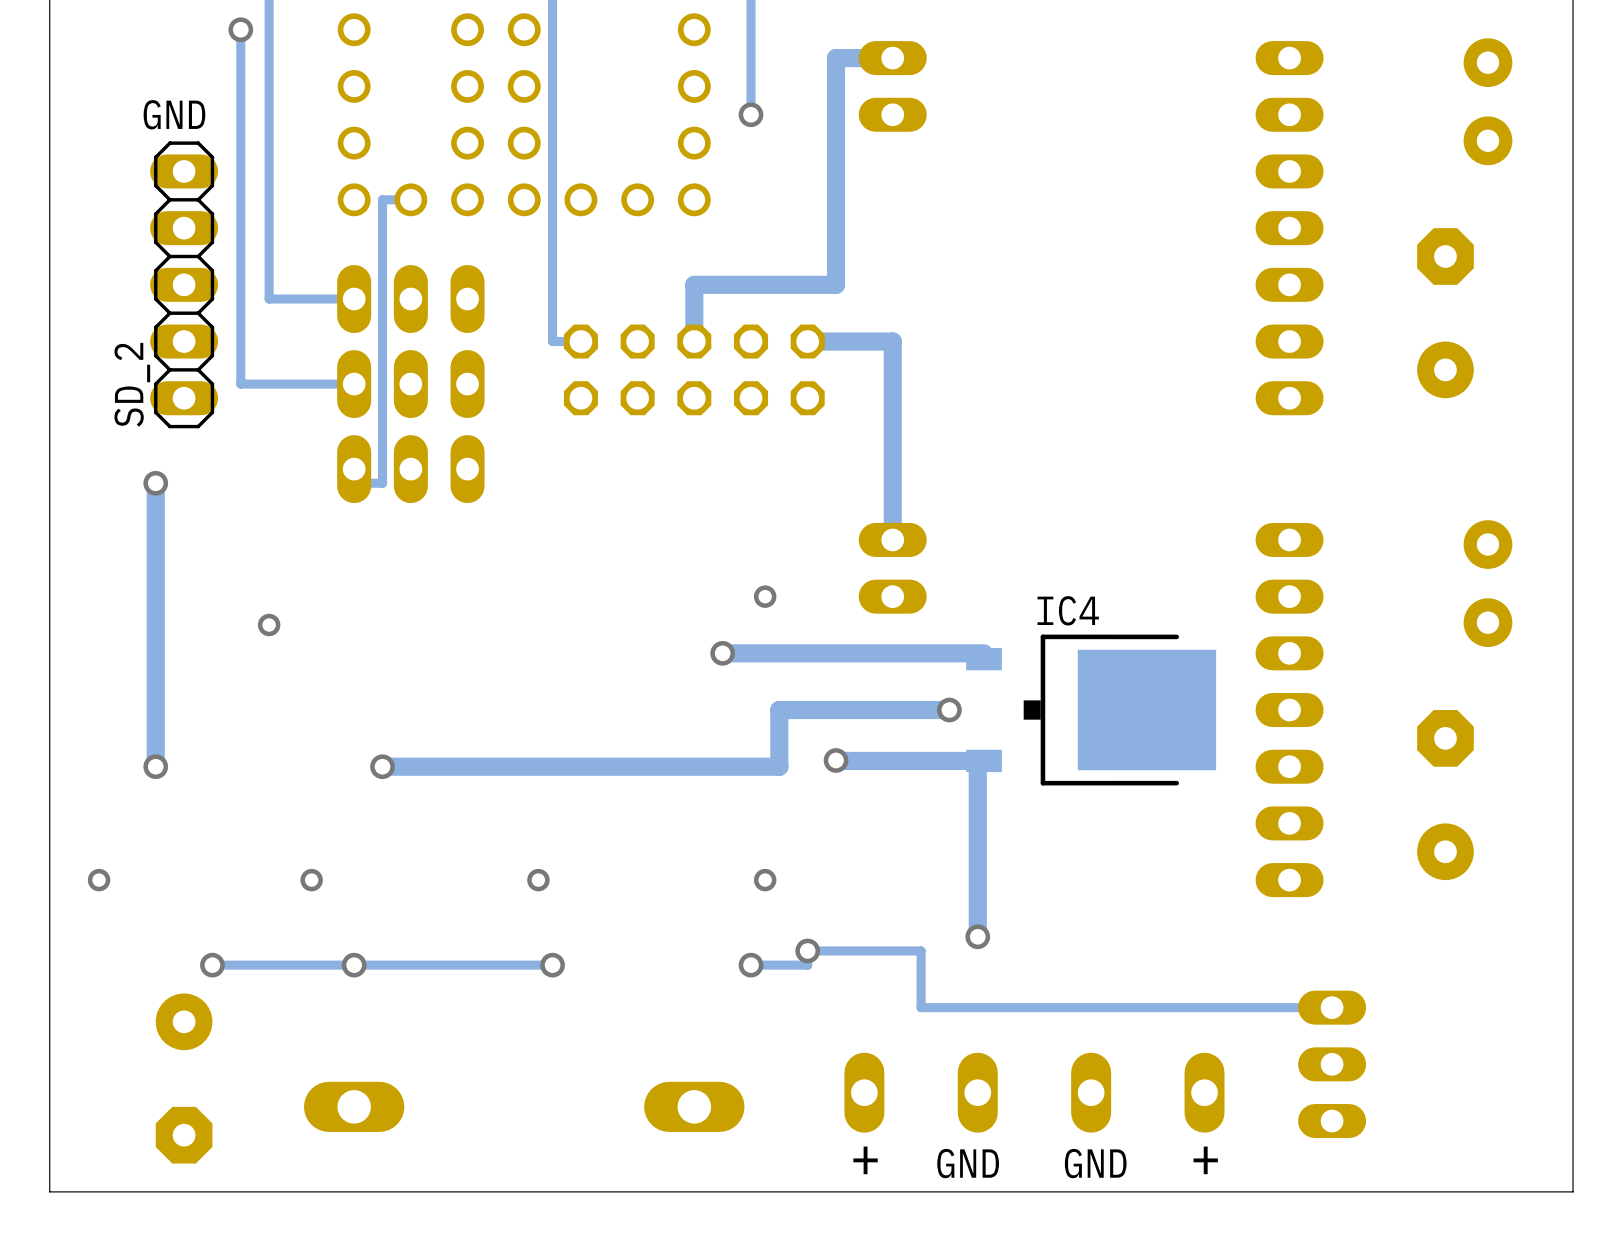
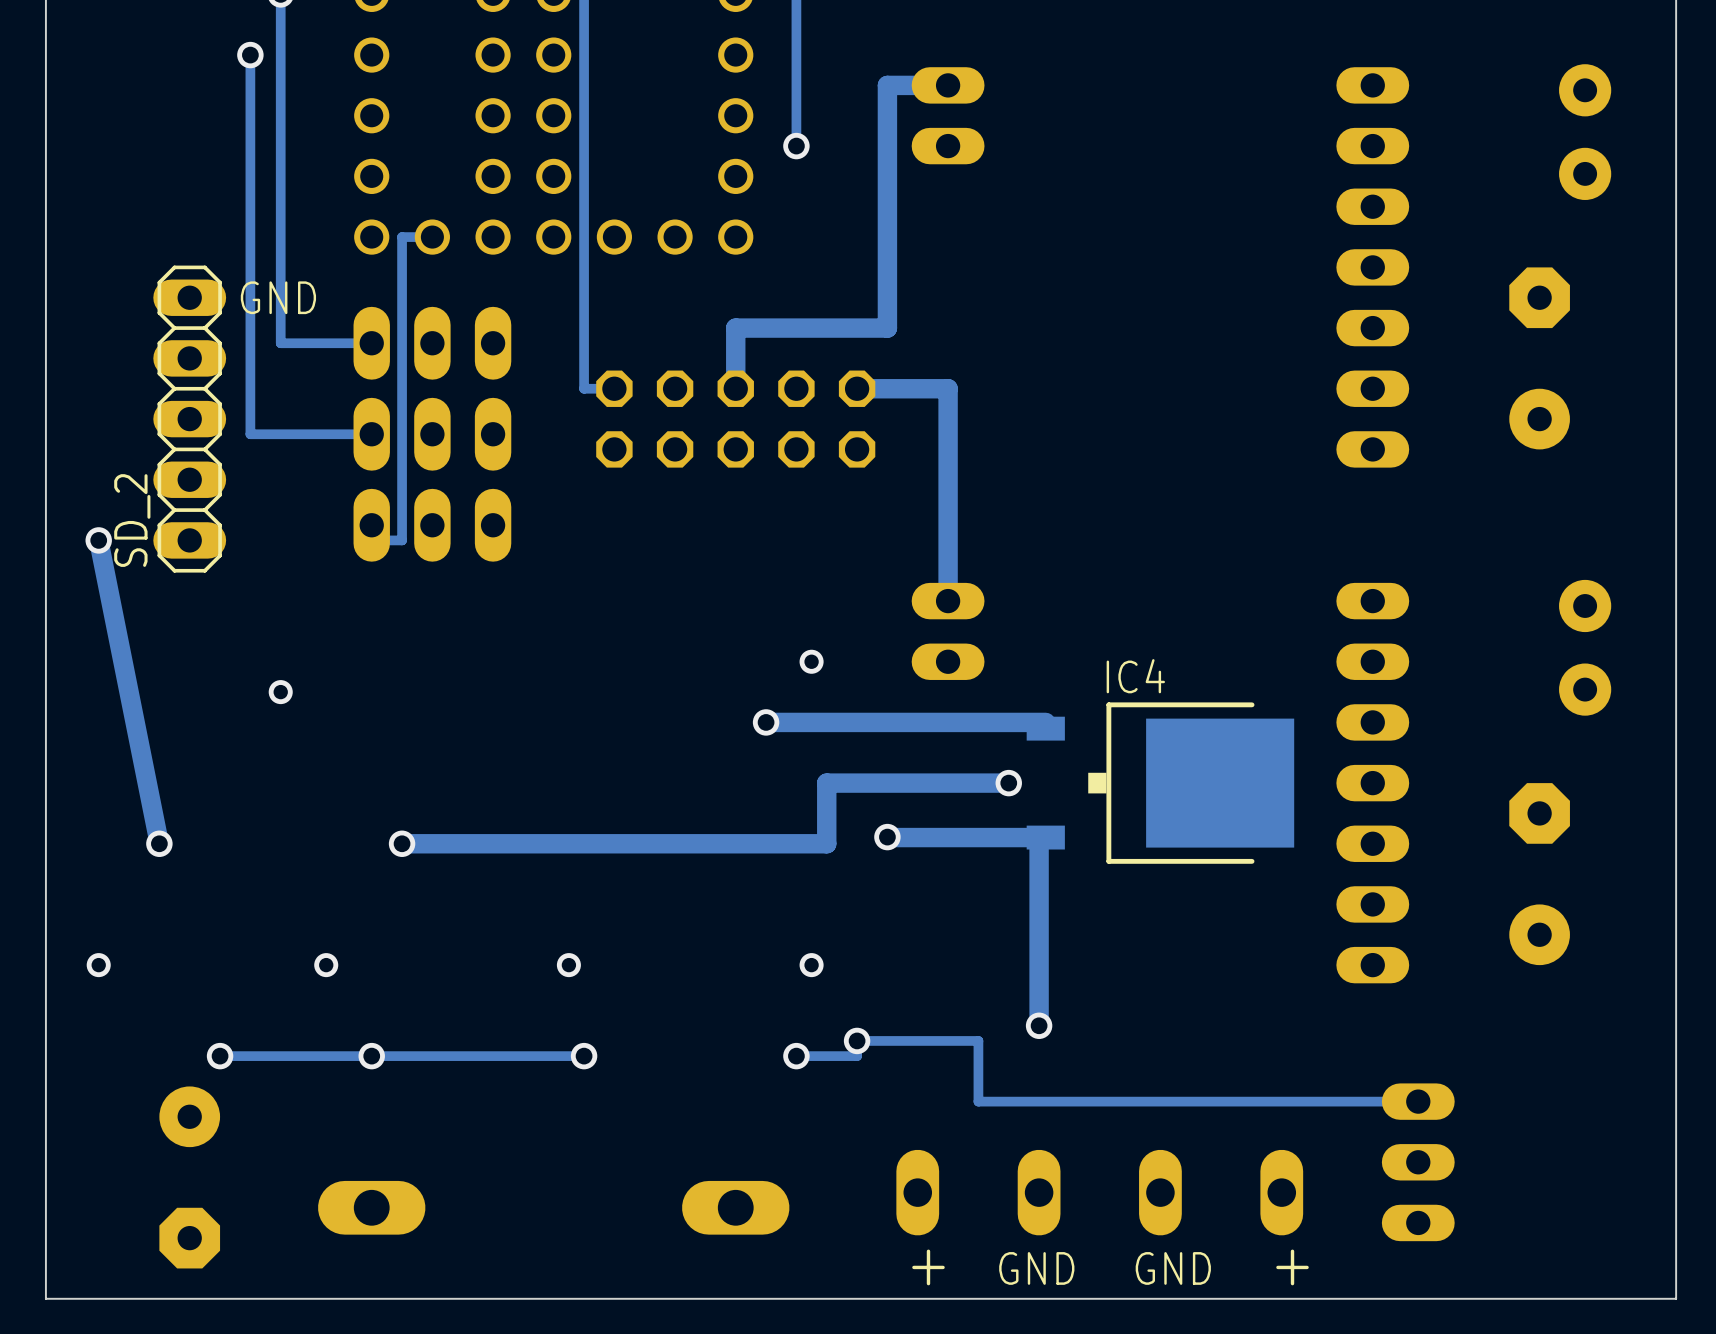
text position: GND (174, 114) -> GND (278, 297)
SD_2 position: (184, 284) -> (189, 419)
track: (155, 483) (155, 766) -> (98, 540) (159, 843)
via position: (155, 483) -> (98, 540)

